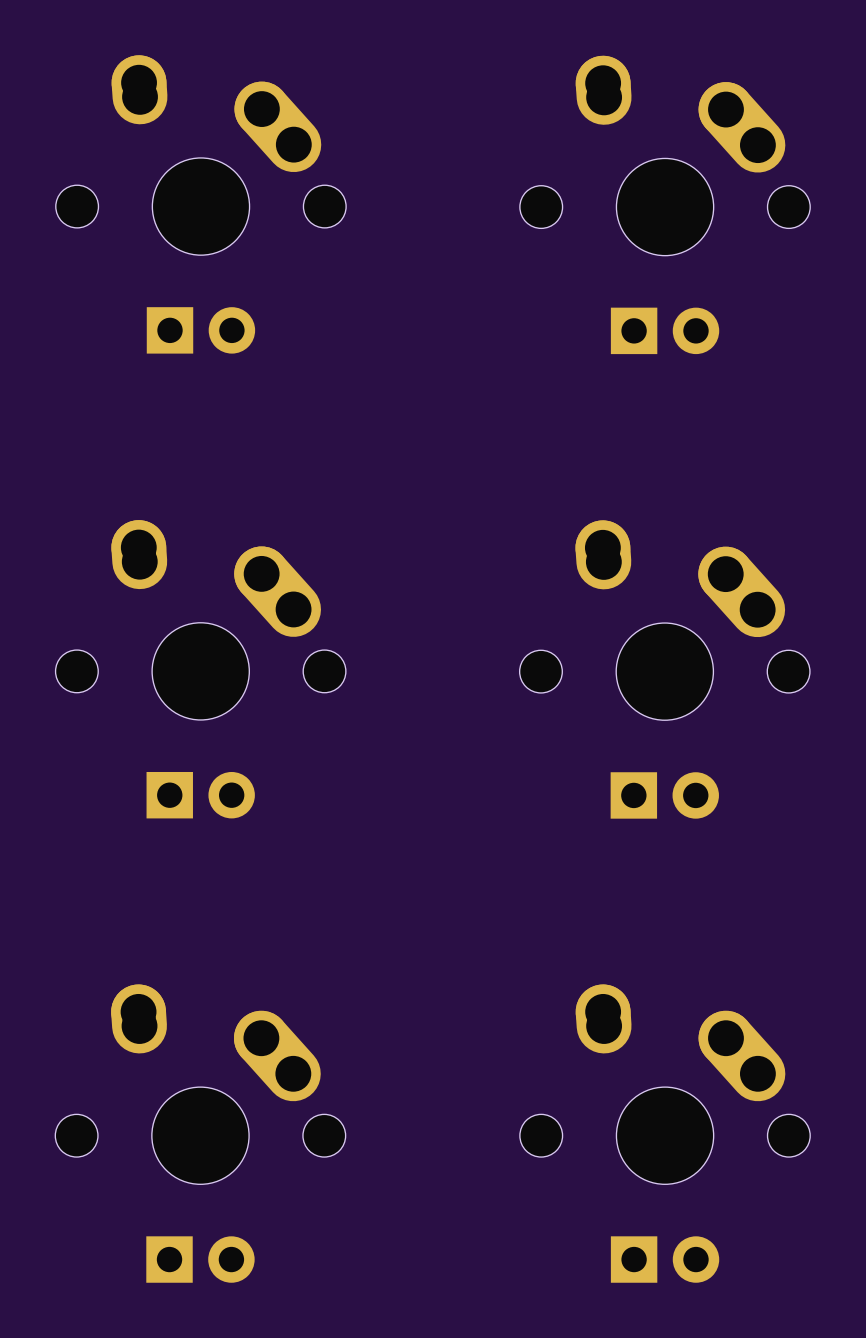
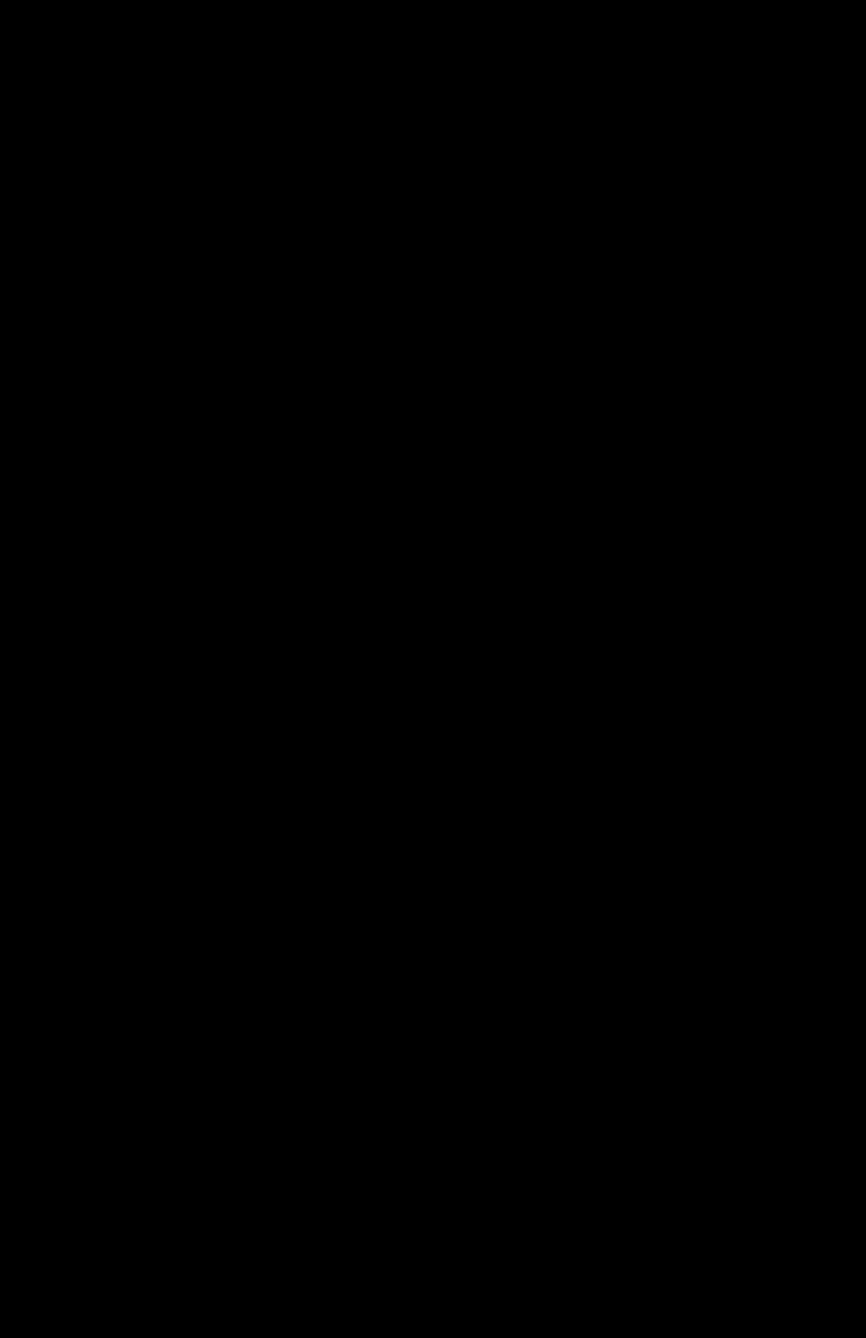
part: (200, 204) -> none
part: (665, 204) -> none
part: (200, 669) -> none
part: (664, 669) -> none
part: (200, 1133) -> none
part: (665, 1133) -> none

